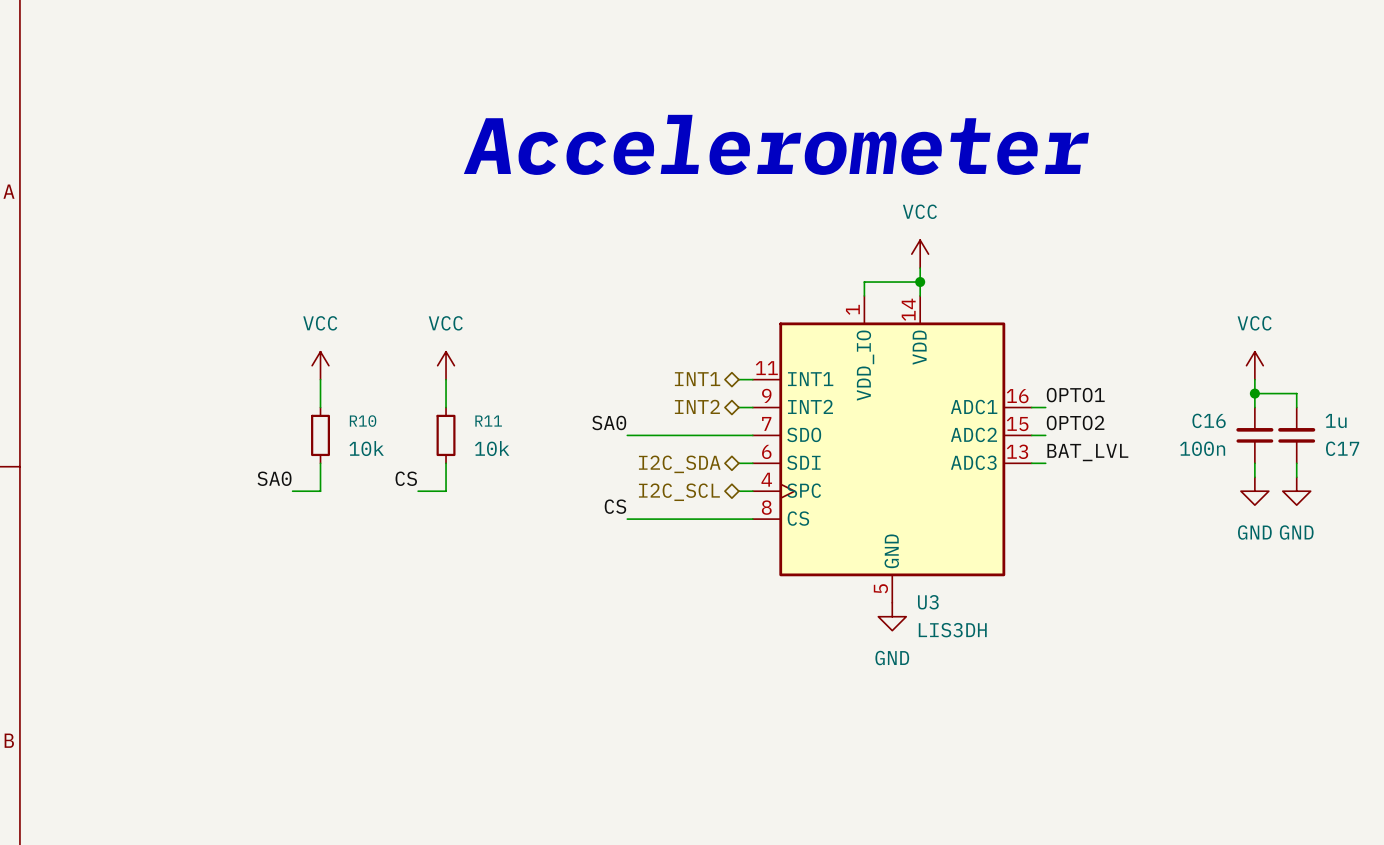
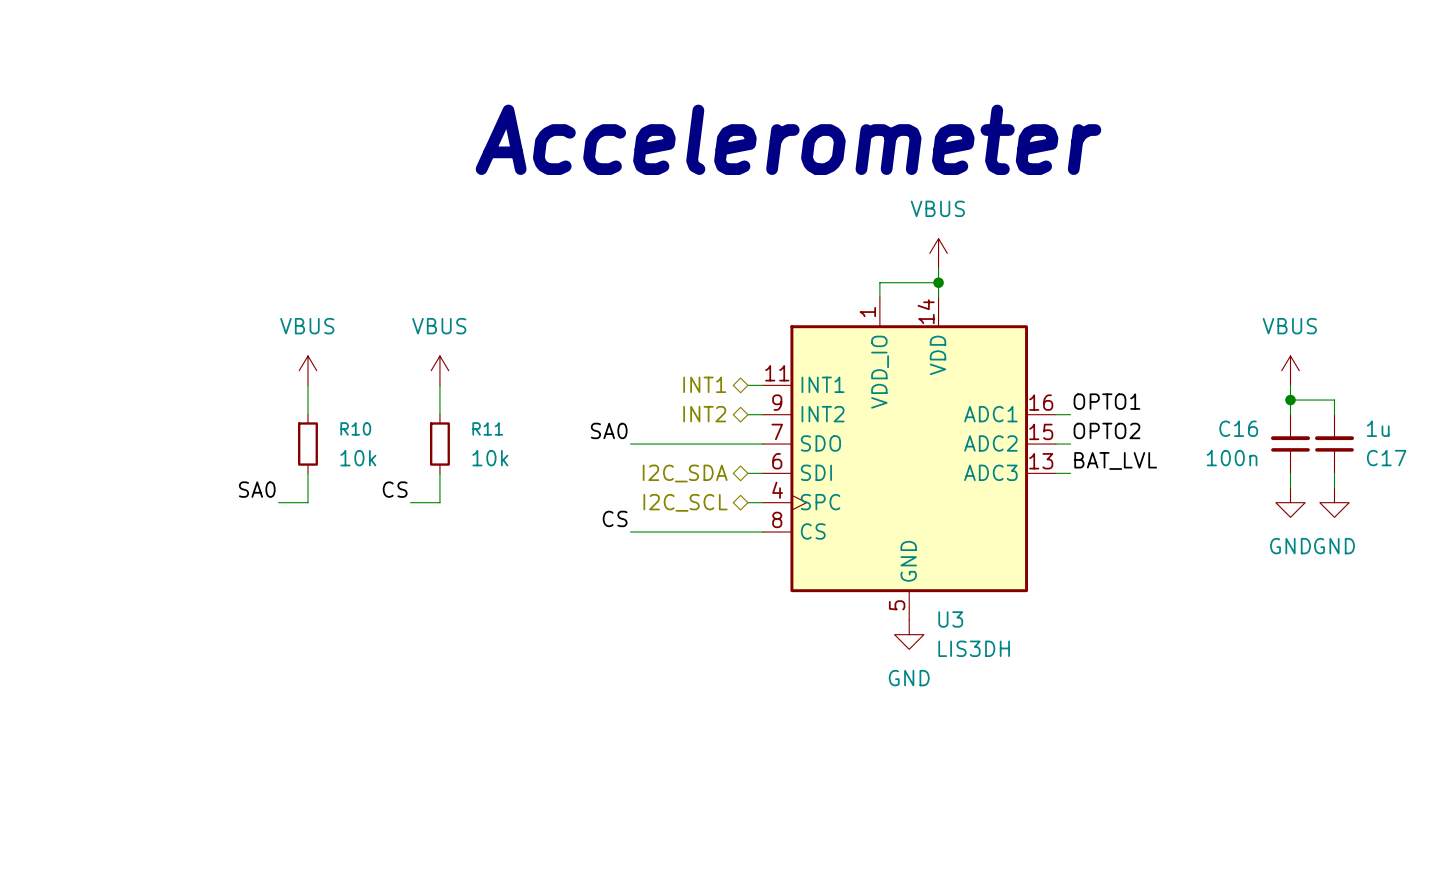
power symbol: VCC (920, 254) -> VBUS (938, 253)
power symbol: VCC (320, 365) -> VBUS (307, 370)
power symbol: VCC (446, 365) -> VBUS (439, 370)
power symbol: VCC (1254, 365) -> VBUS (1290, 370)

